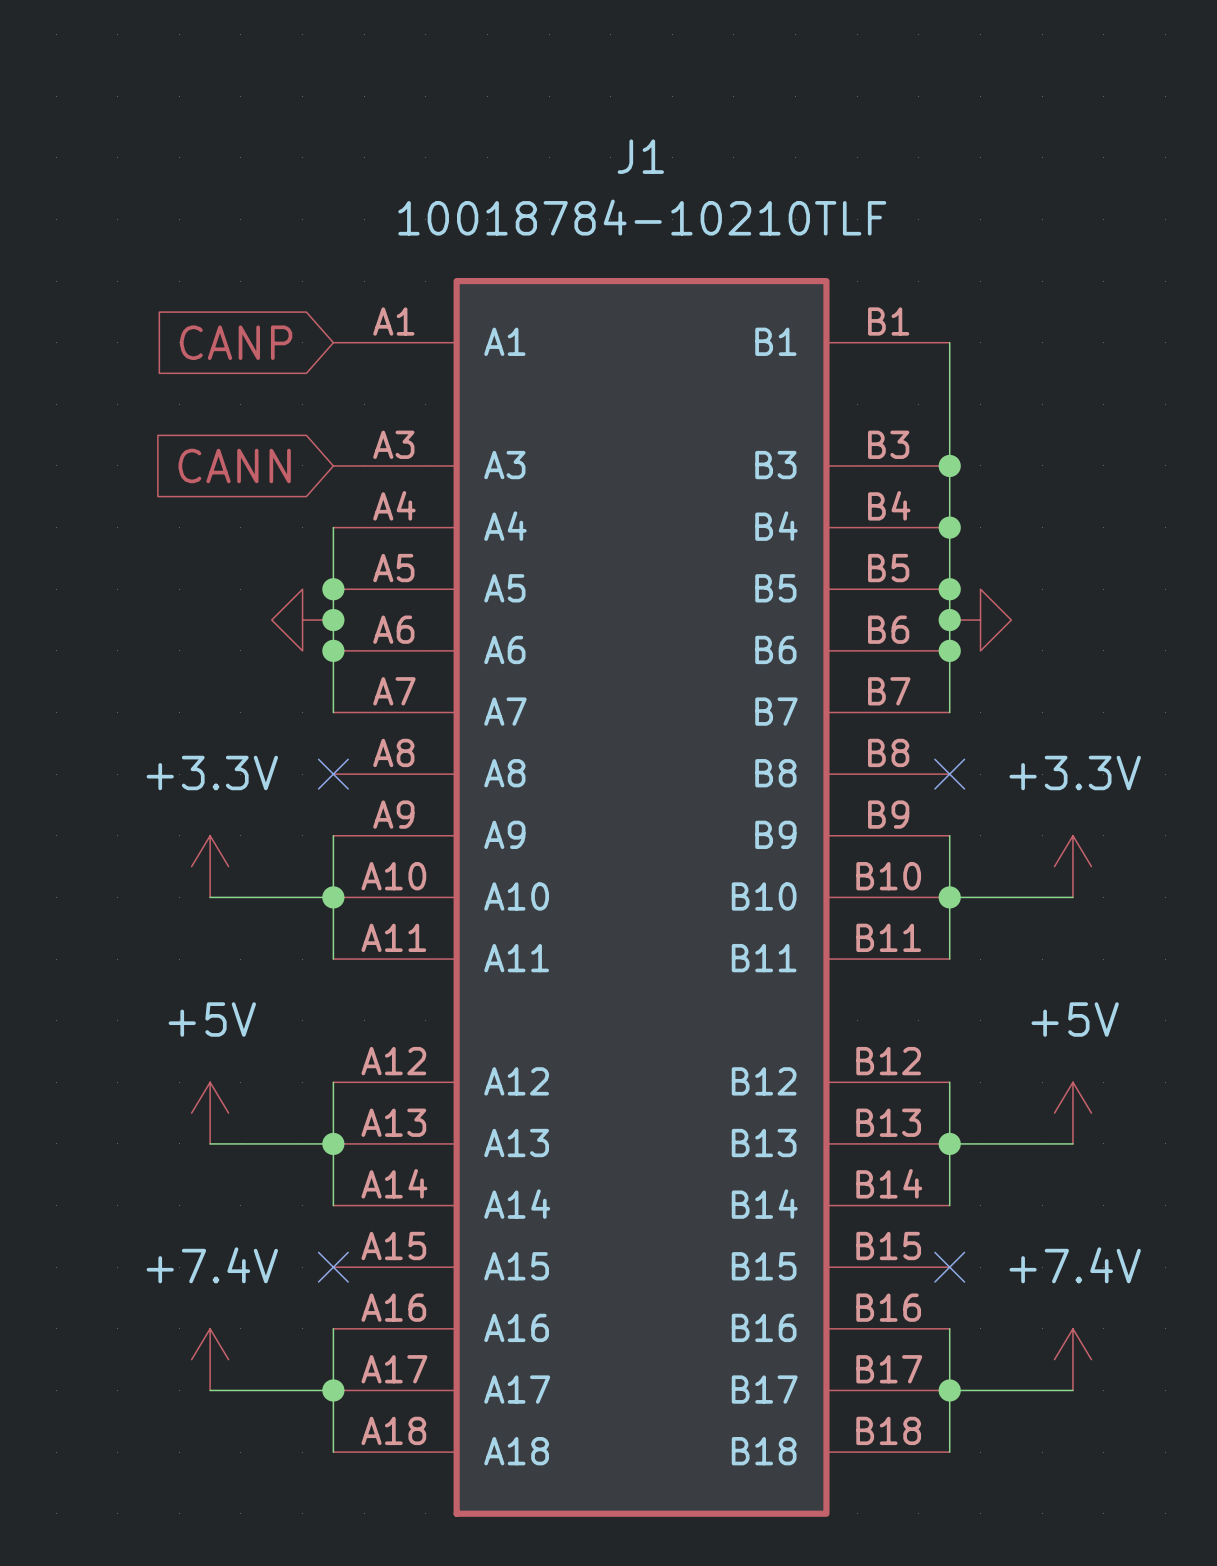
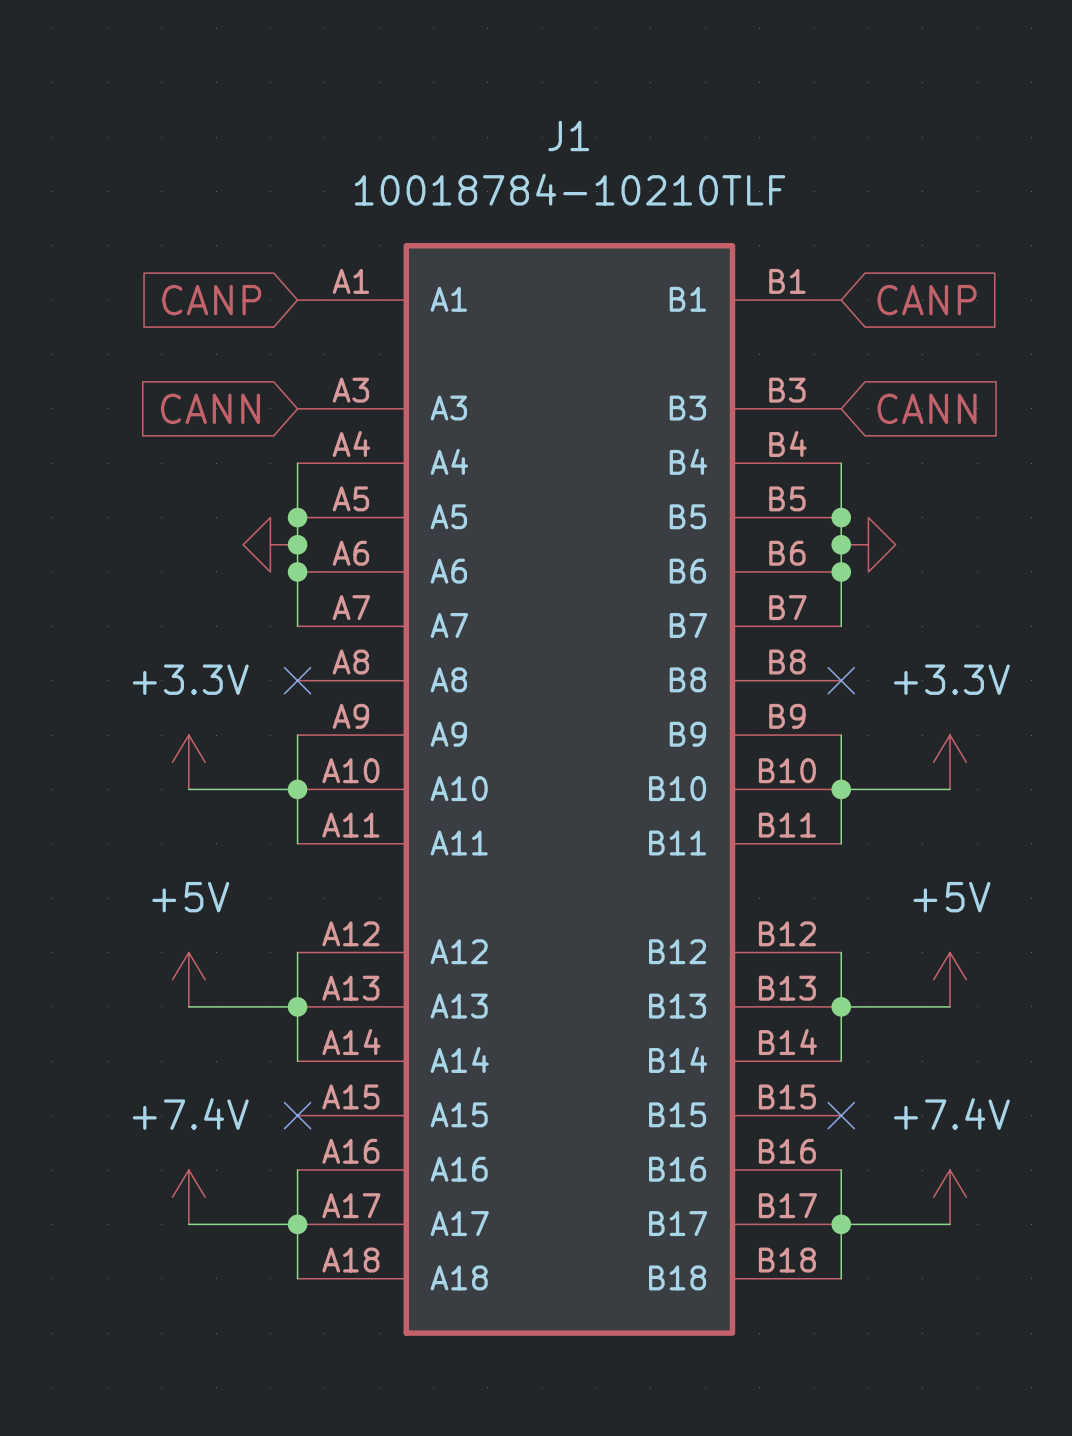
wire: (949, 342) (949, 527) -> none
global label: none -> CANP (927, 300)
junction: (949, 465) -> none
global label: none -> CANN (927, 408)
junction: (949, 527) -> none

